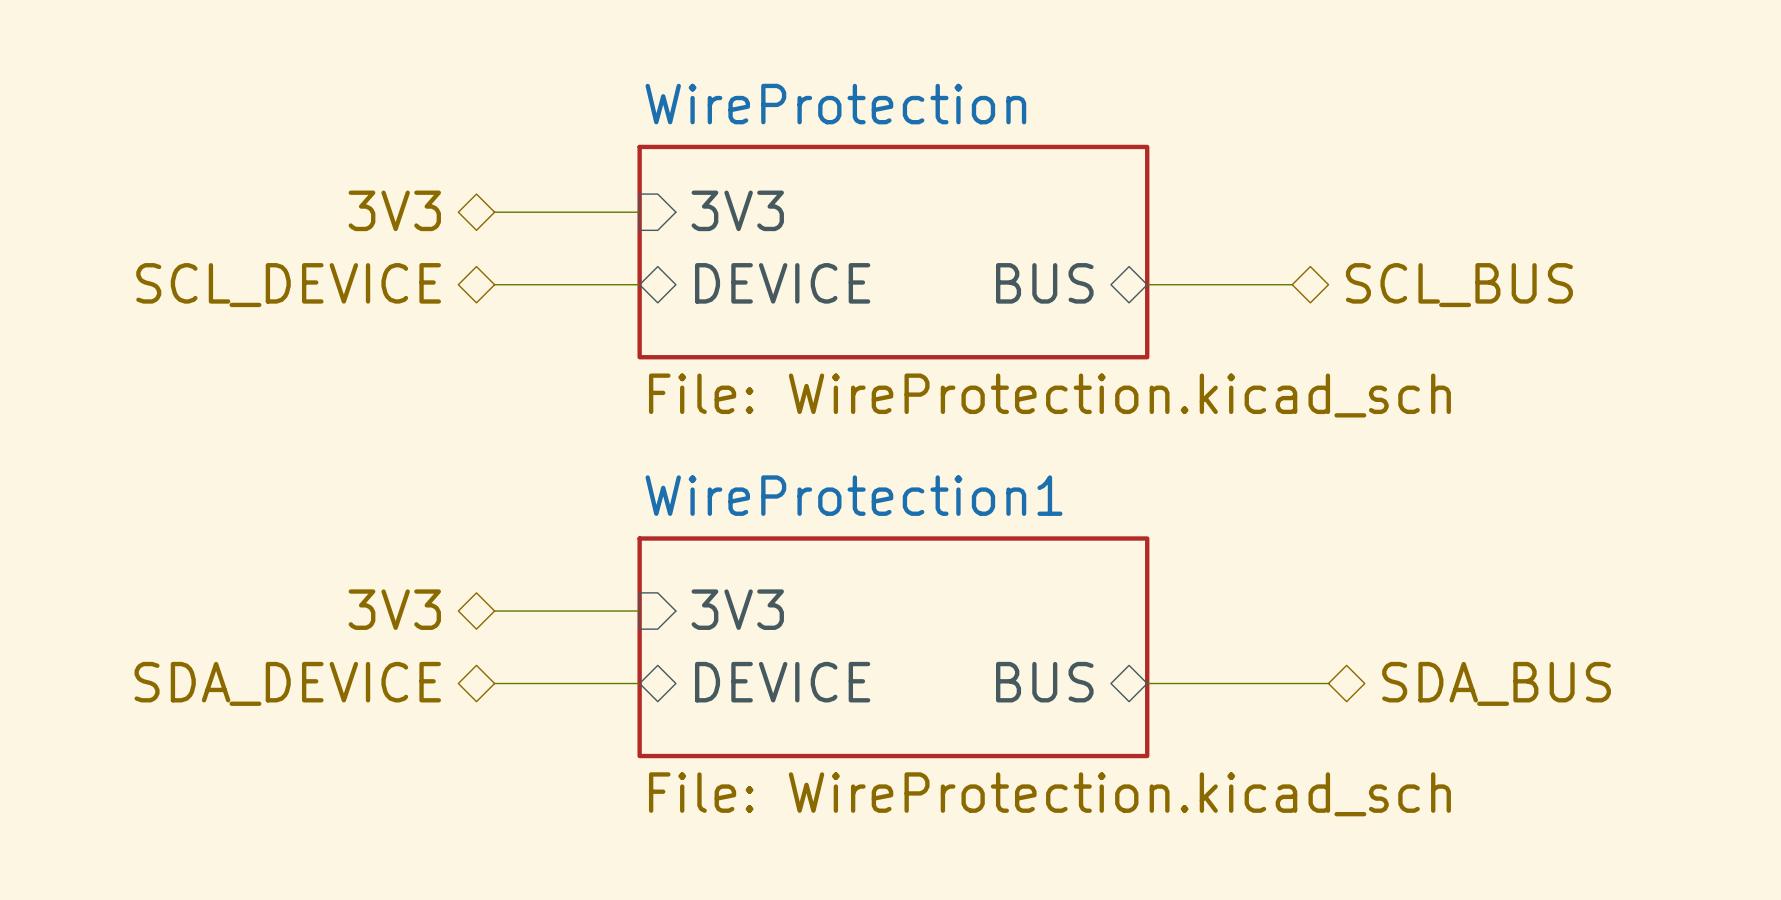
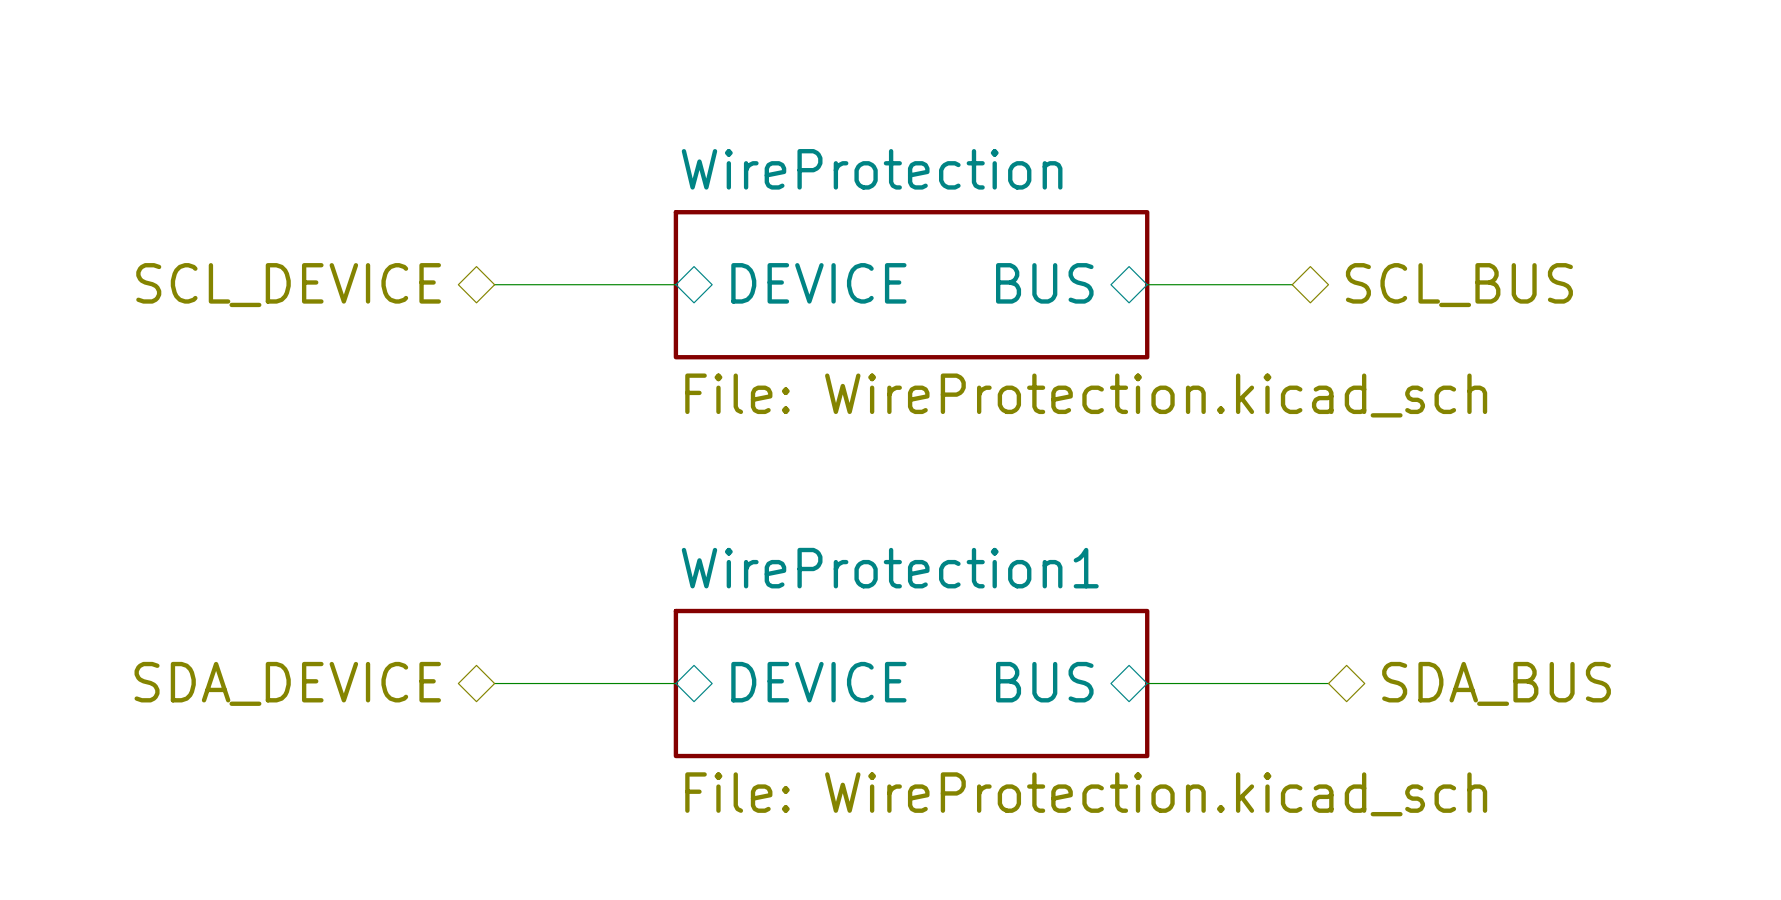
hierarchical label: 3V3 (394, 210) -> none
sheet pin: 3V3 (737, 210) -> none
wire: (494, 212) (639, 212) -> none
sheet WireProtection: File: WireProtection.kicad_sch (893, 252) -> none
sheet pin position: DEVICE (782, 283) -> DEVICE (818, 283)
wire: none -> (639, 284) (675, 284)
sheet WireProtection: none -> File: WireProtection.kicad_sch (911, 284)
sheet WireProtection1 shape: [637, 536, 1150, 759] -> [673, 608, 1150, 759]
hierarchical label: 3V3 (394, 609) -> none
sheet pin: 3V3 (737, 609) -> none
wire: (494, 611) (639, 611) -> none
sheet pin position: DEVICE (782, 682) -> DEVICE (818, 682)
wire: none -> (639, 683) (675, 683)

